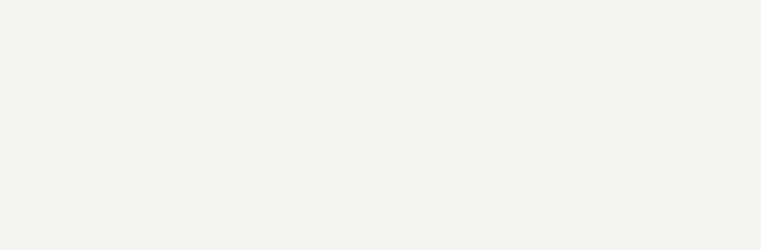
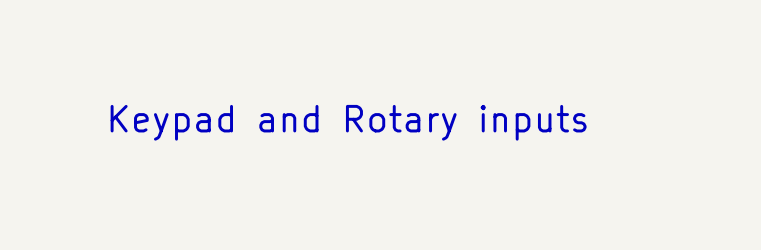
text: none -> Keypad and Rotary inputs (348, 122)

